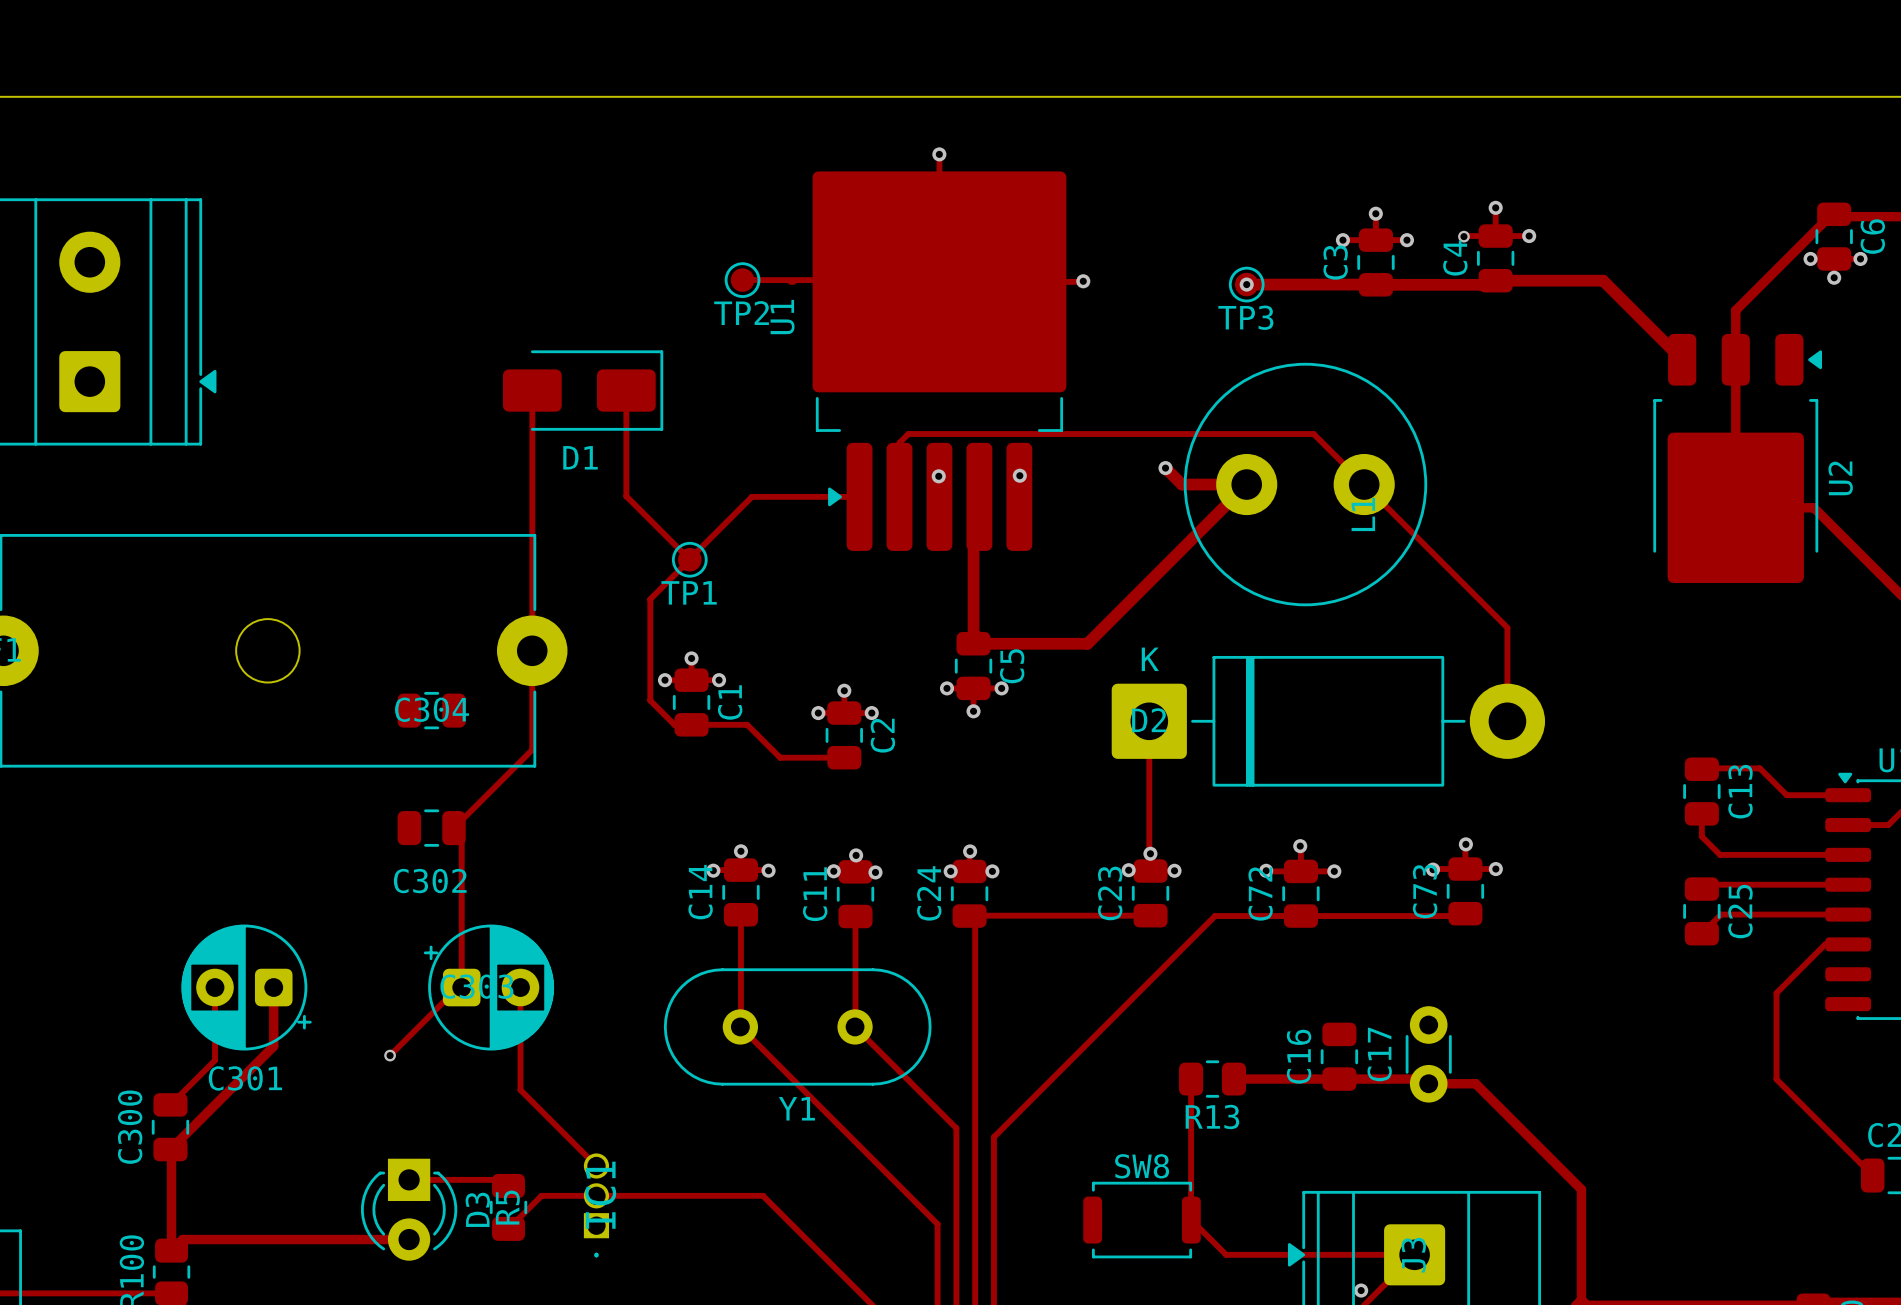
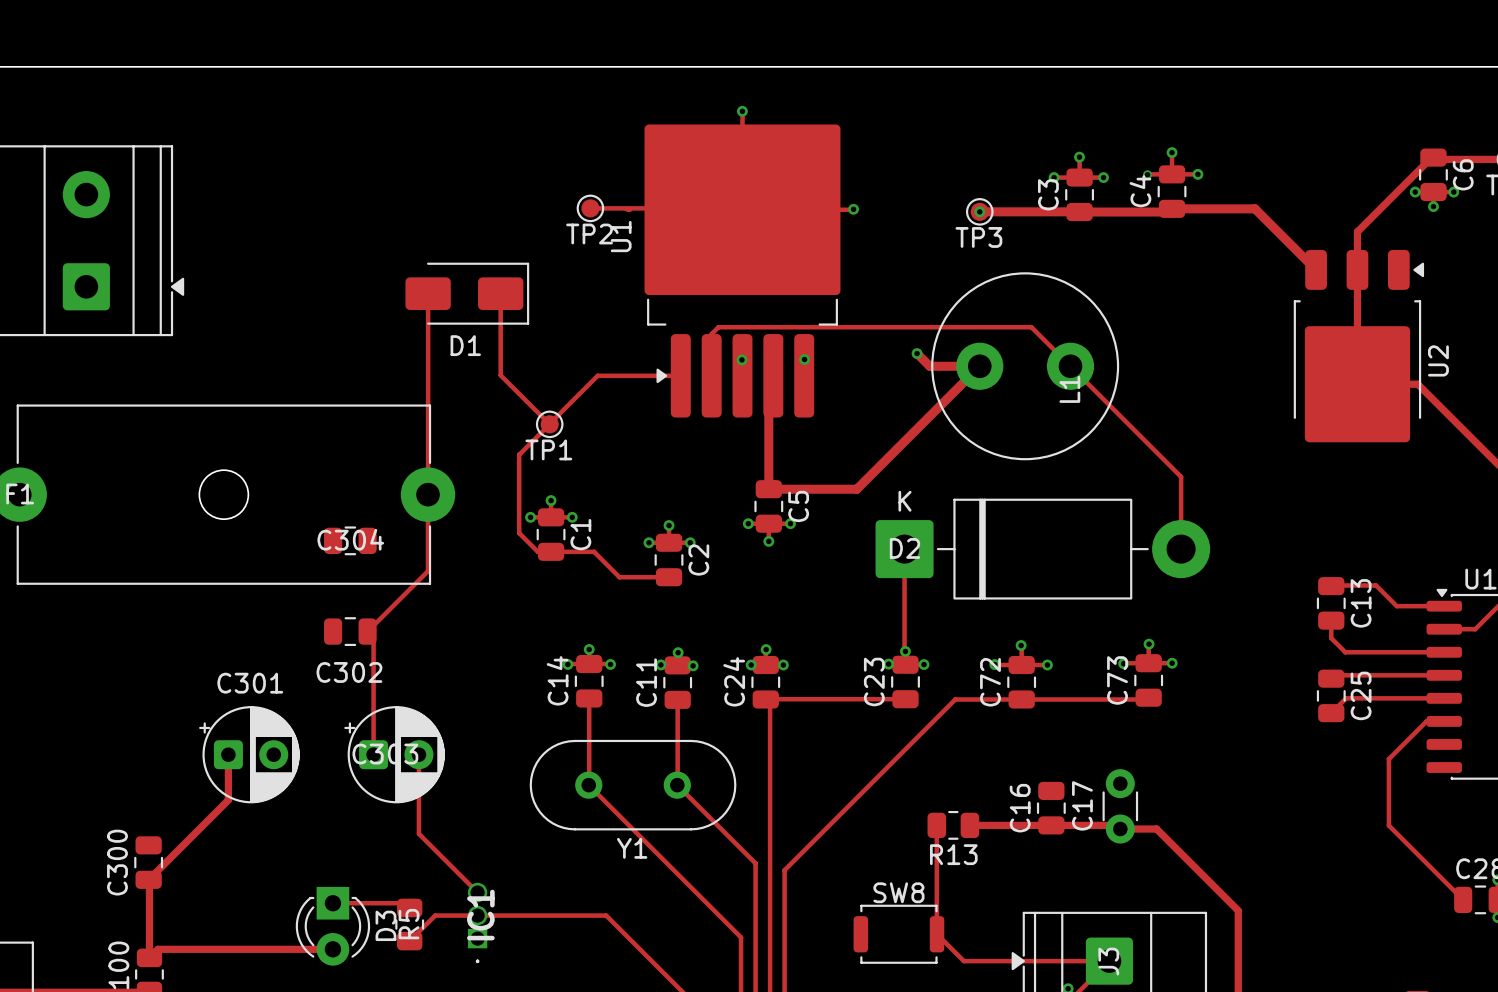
track: (215, 987) (215, 1060) (170, 1104) -> none
C301 rotation: 0° (246, 987) -> 180° (249, 754)
track: (461, 987) (458, 987) (390, 1055) -> none
via: (390, 1055) -> none

